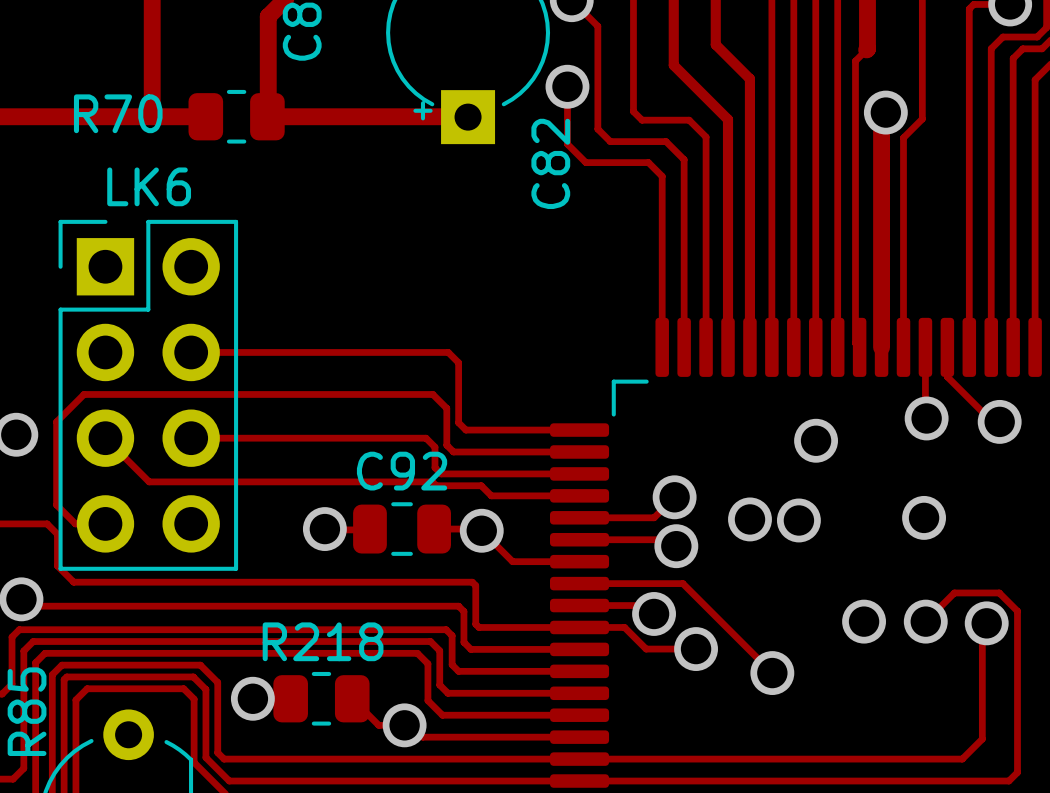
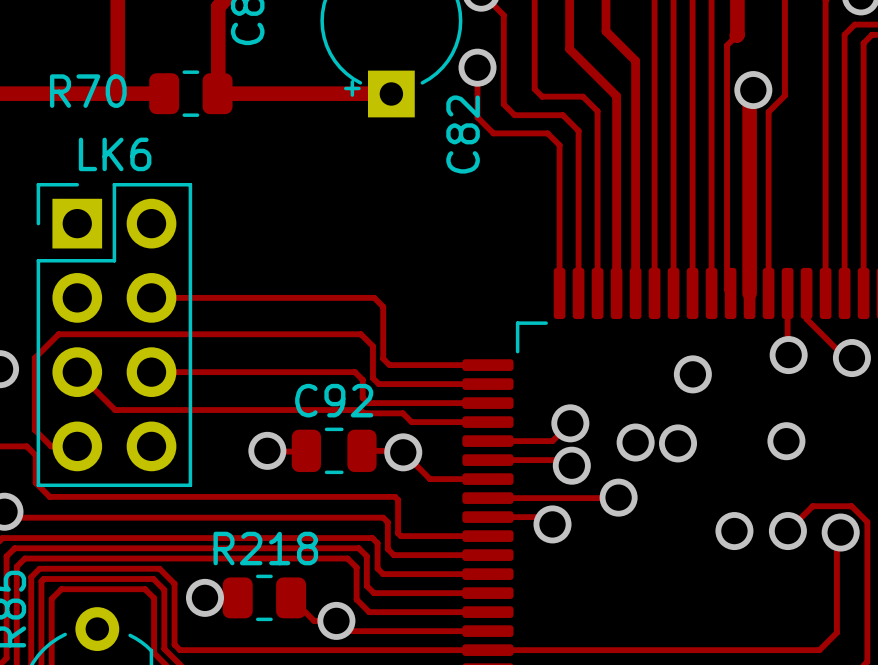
track: (682, 583) (772, 673) -> (577, 498) (618, 497)
via: none -> (618, 497)
track: (579, 627) (624, 627) (646, 649) (696, 649) -> none
via: (696, 649) -> none
via: (772, 673) -> none

